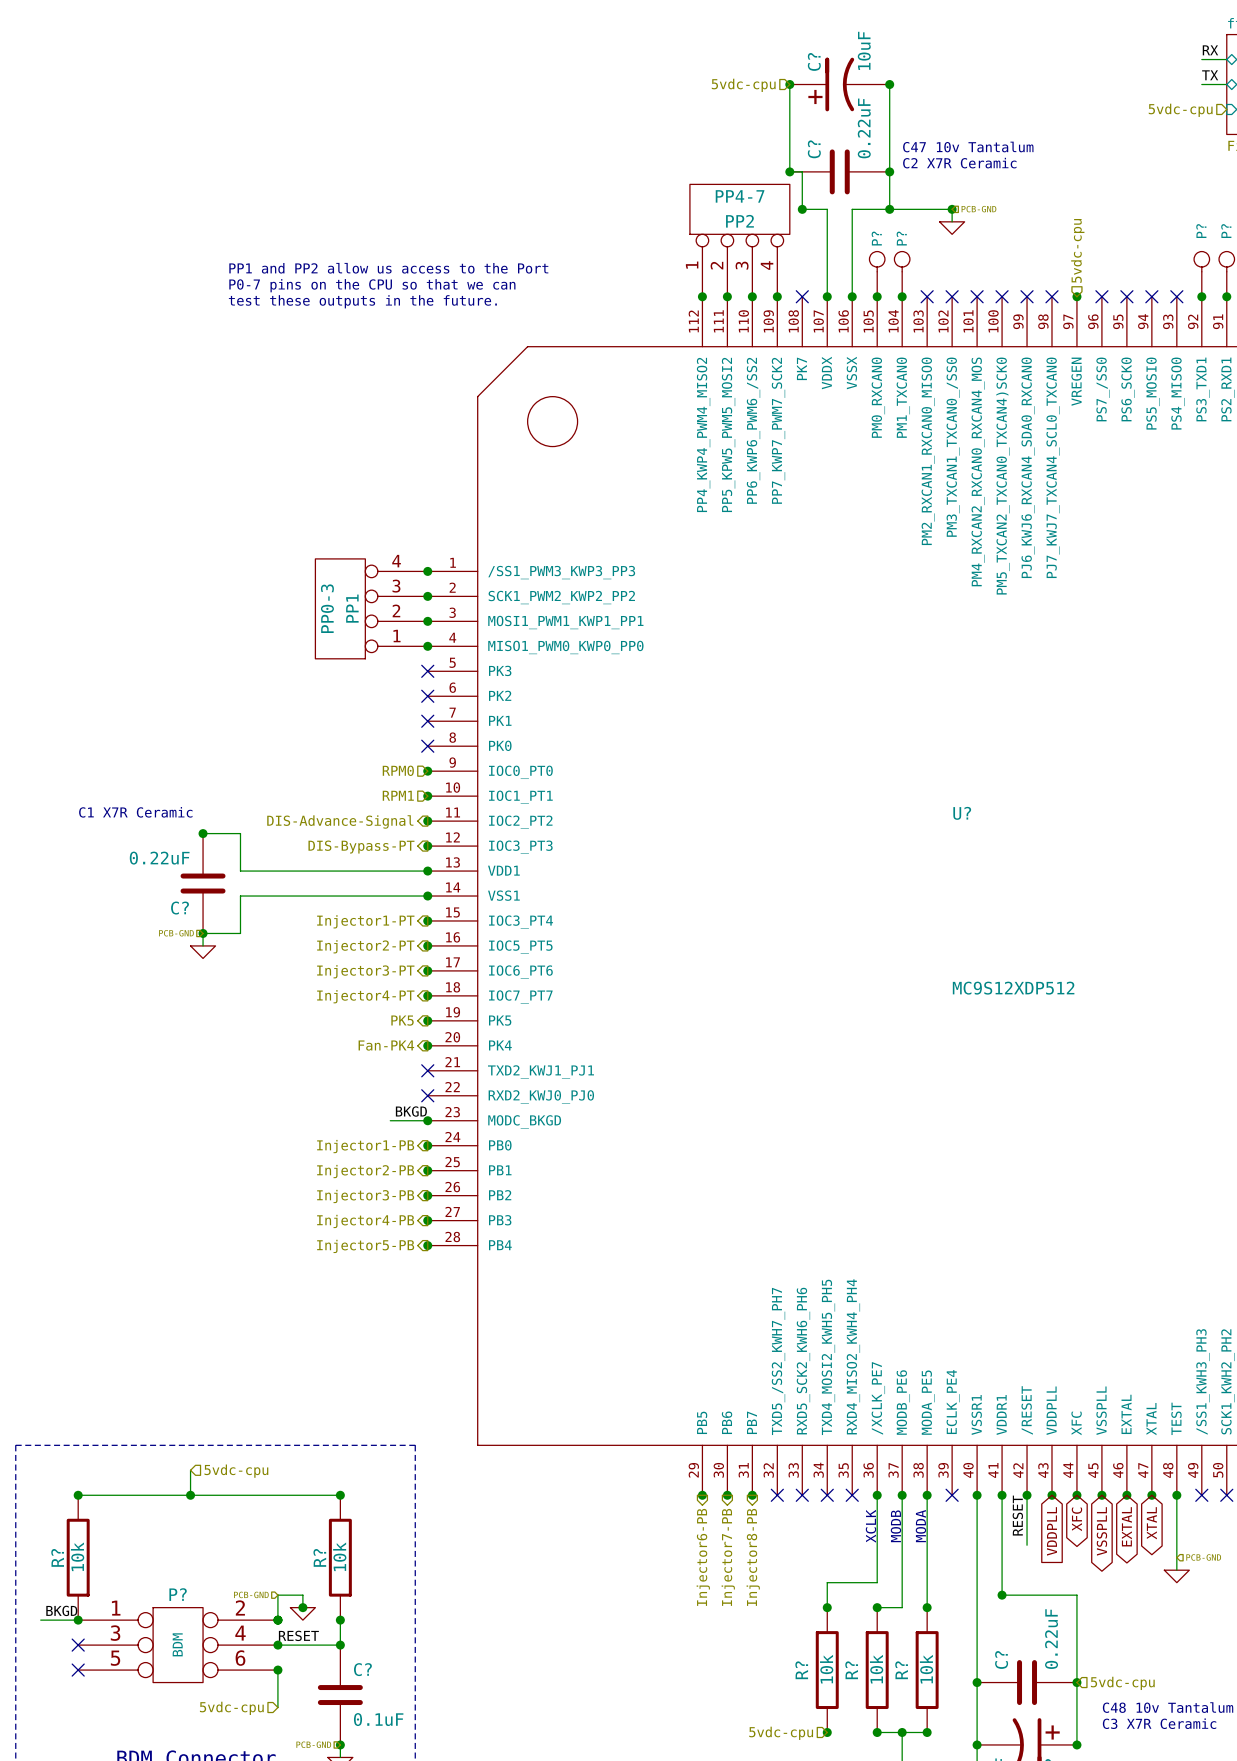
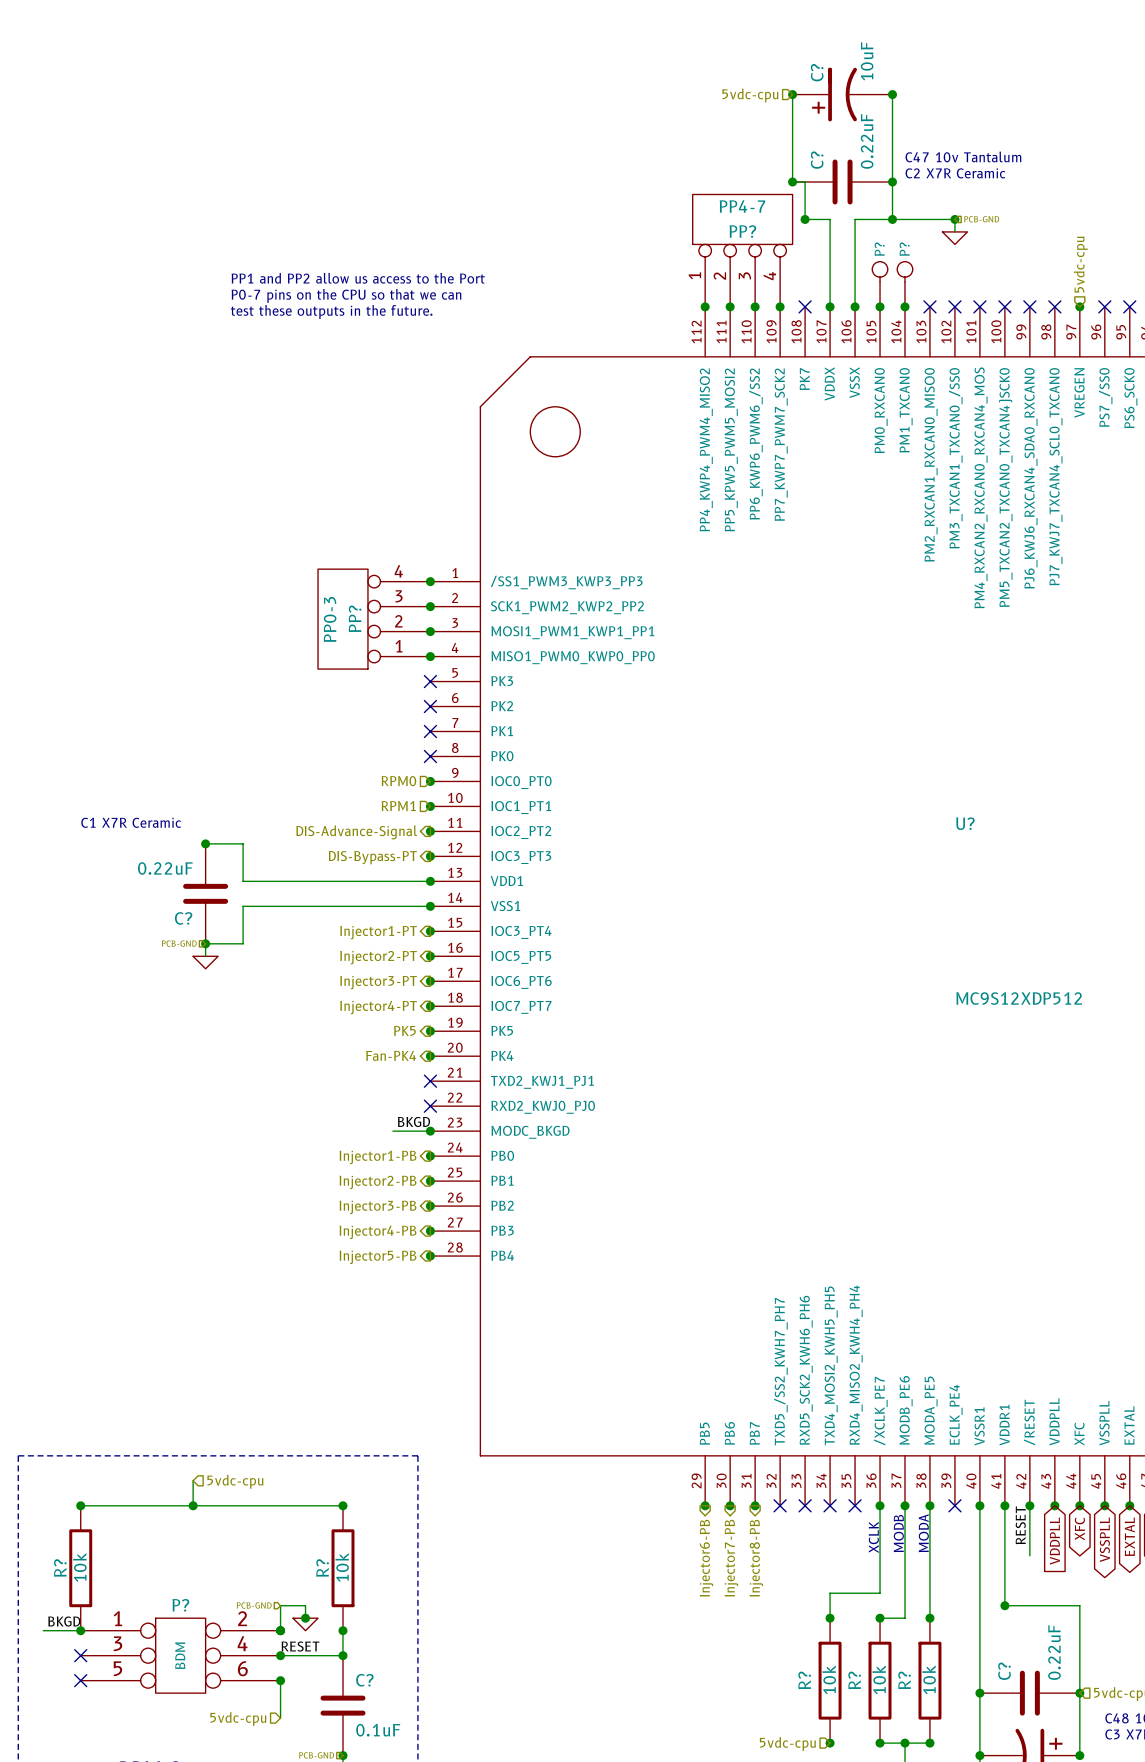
PP2 name: PP2 (739, 221) -> PP? (742, 231)
PP1 name: PP1 (352, 608) -> PP? (355, 618)

